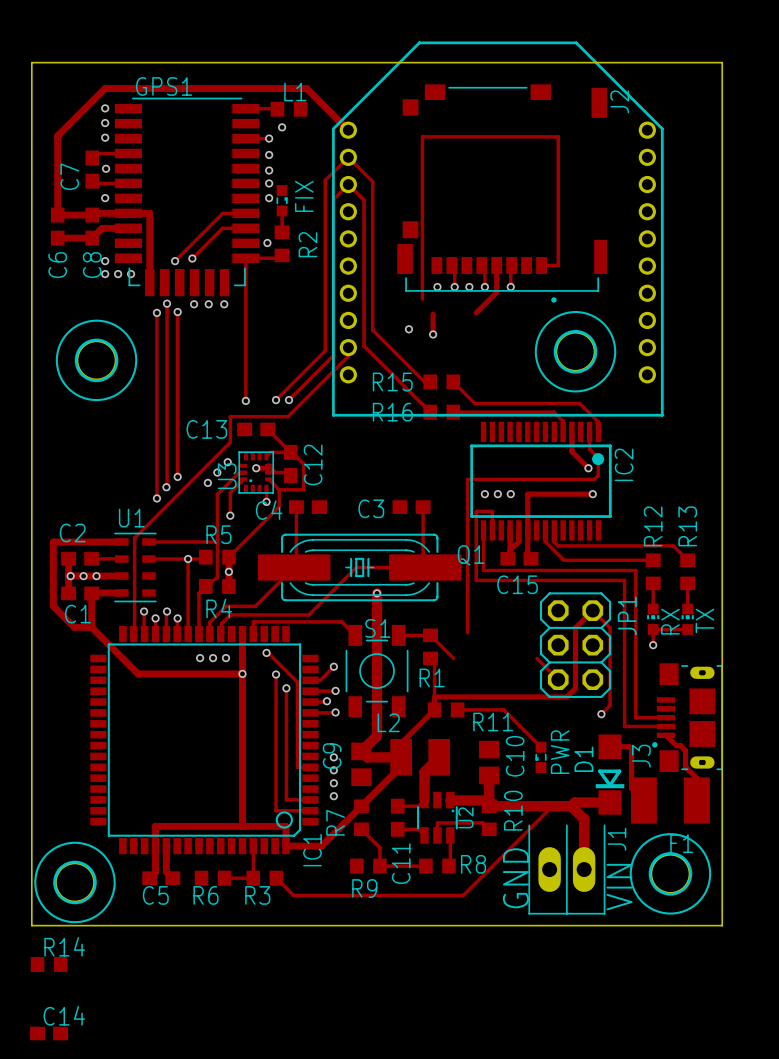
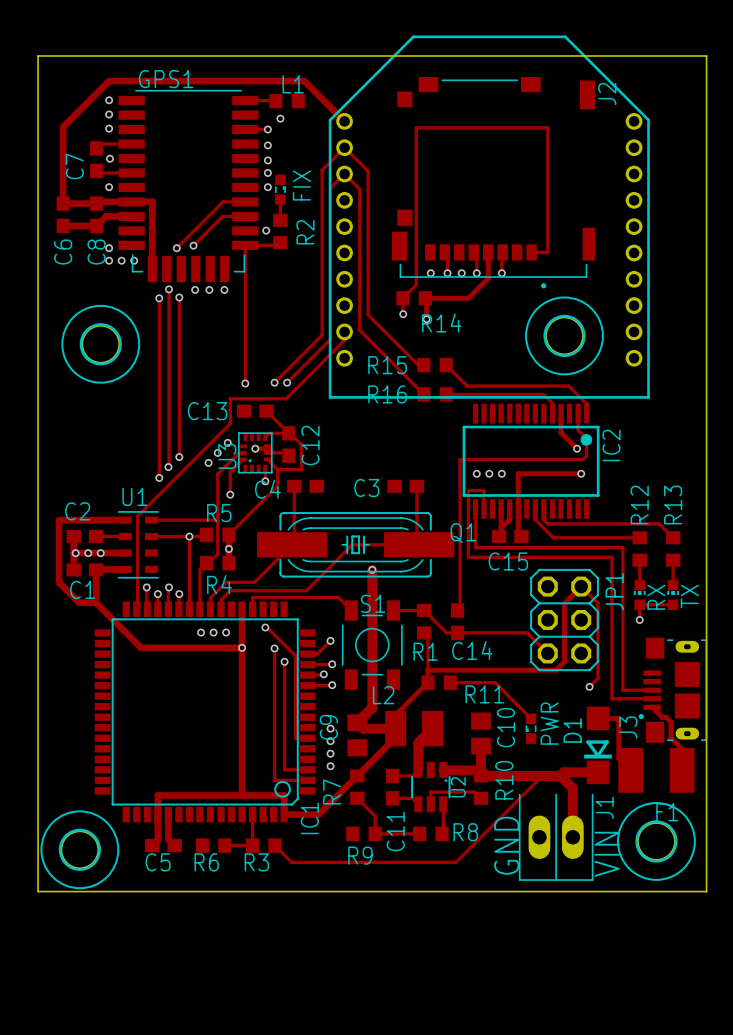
track: none -> (416, 284) (402, 298) (402, 313)
track: none -> (468, 298) (425, 298) (426, 299)
track: none -> (446, 632) (527, 632)
R14 name position: R14 (64, 946) -> R14 (441, 322)
R14 position: (49, 964) -> (414, 298)
C14 rotation: 0° (49, 1033) -> 90° clockwise (457, 621)
C14 position: (49, 1033) -> (457, 621)

